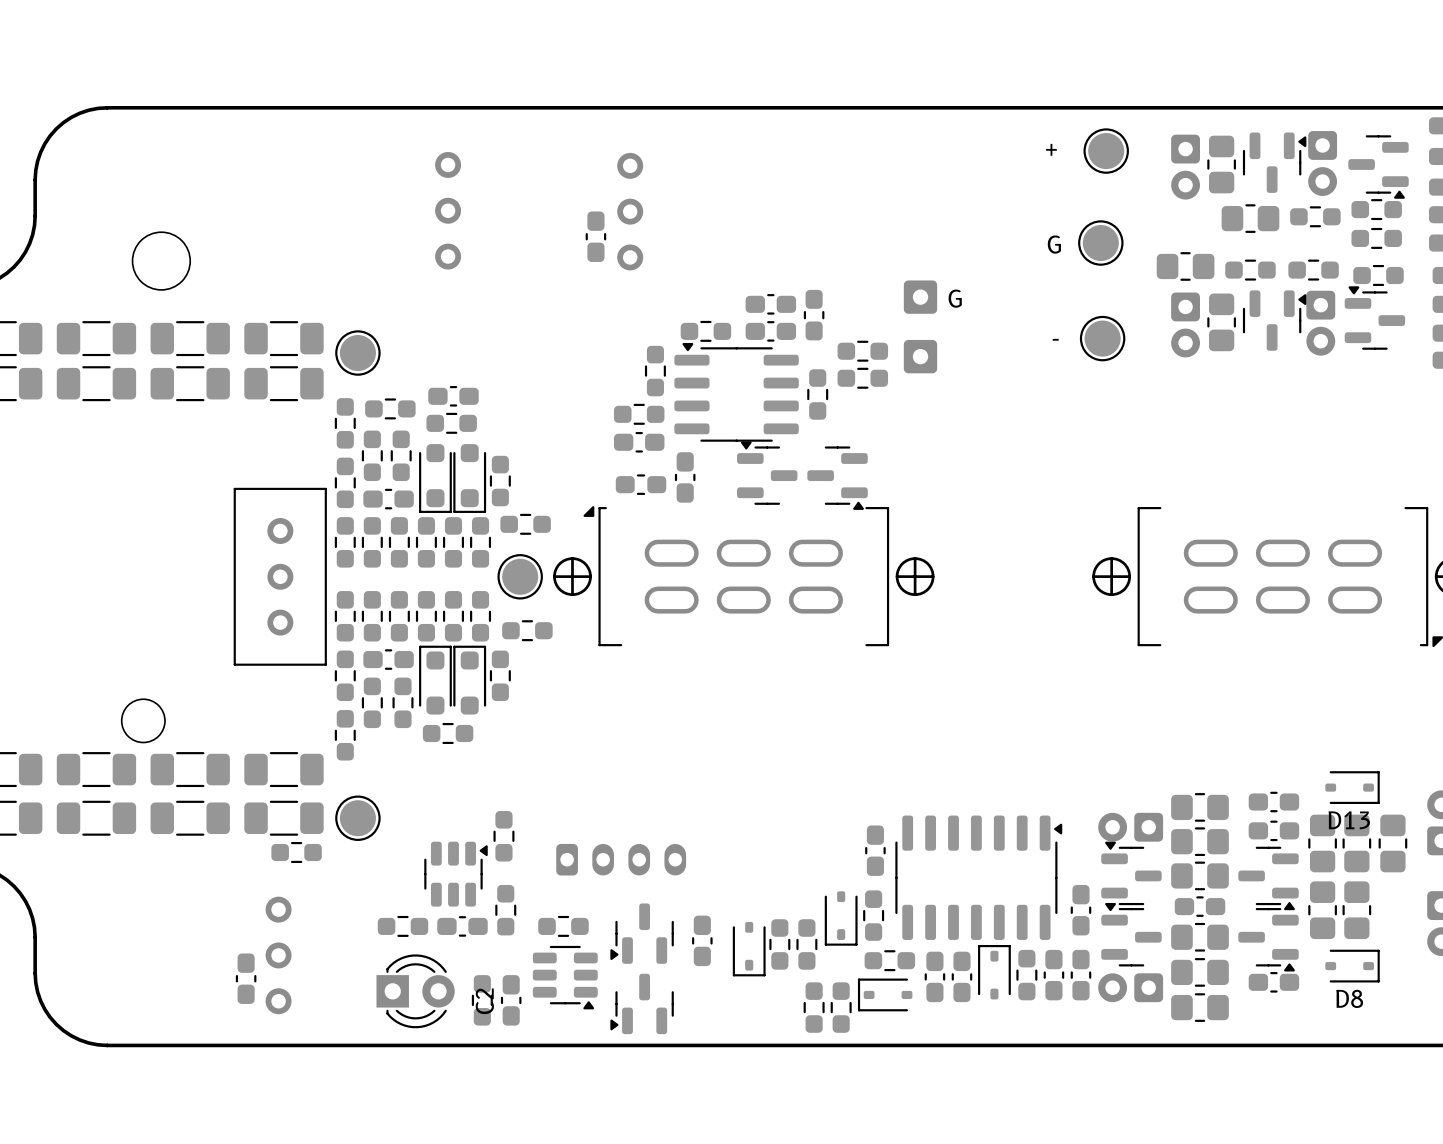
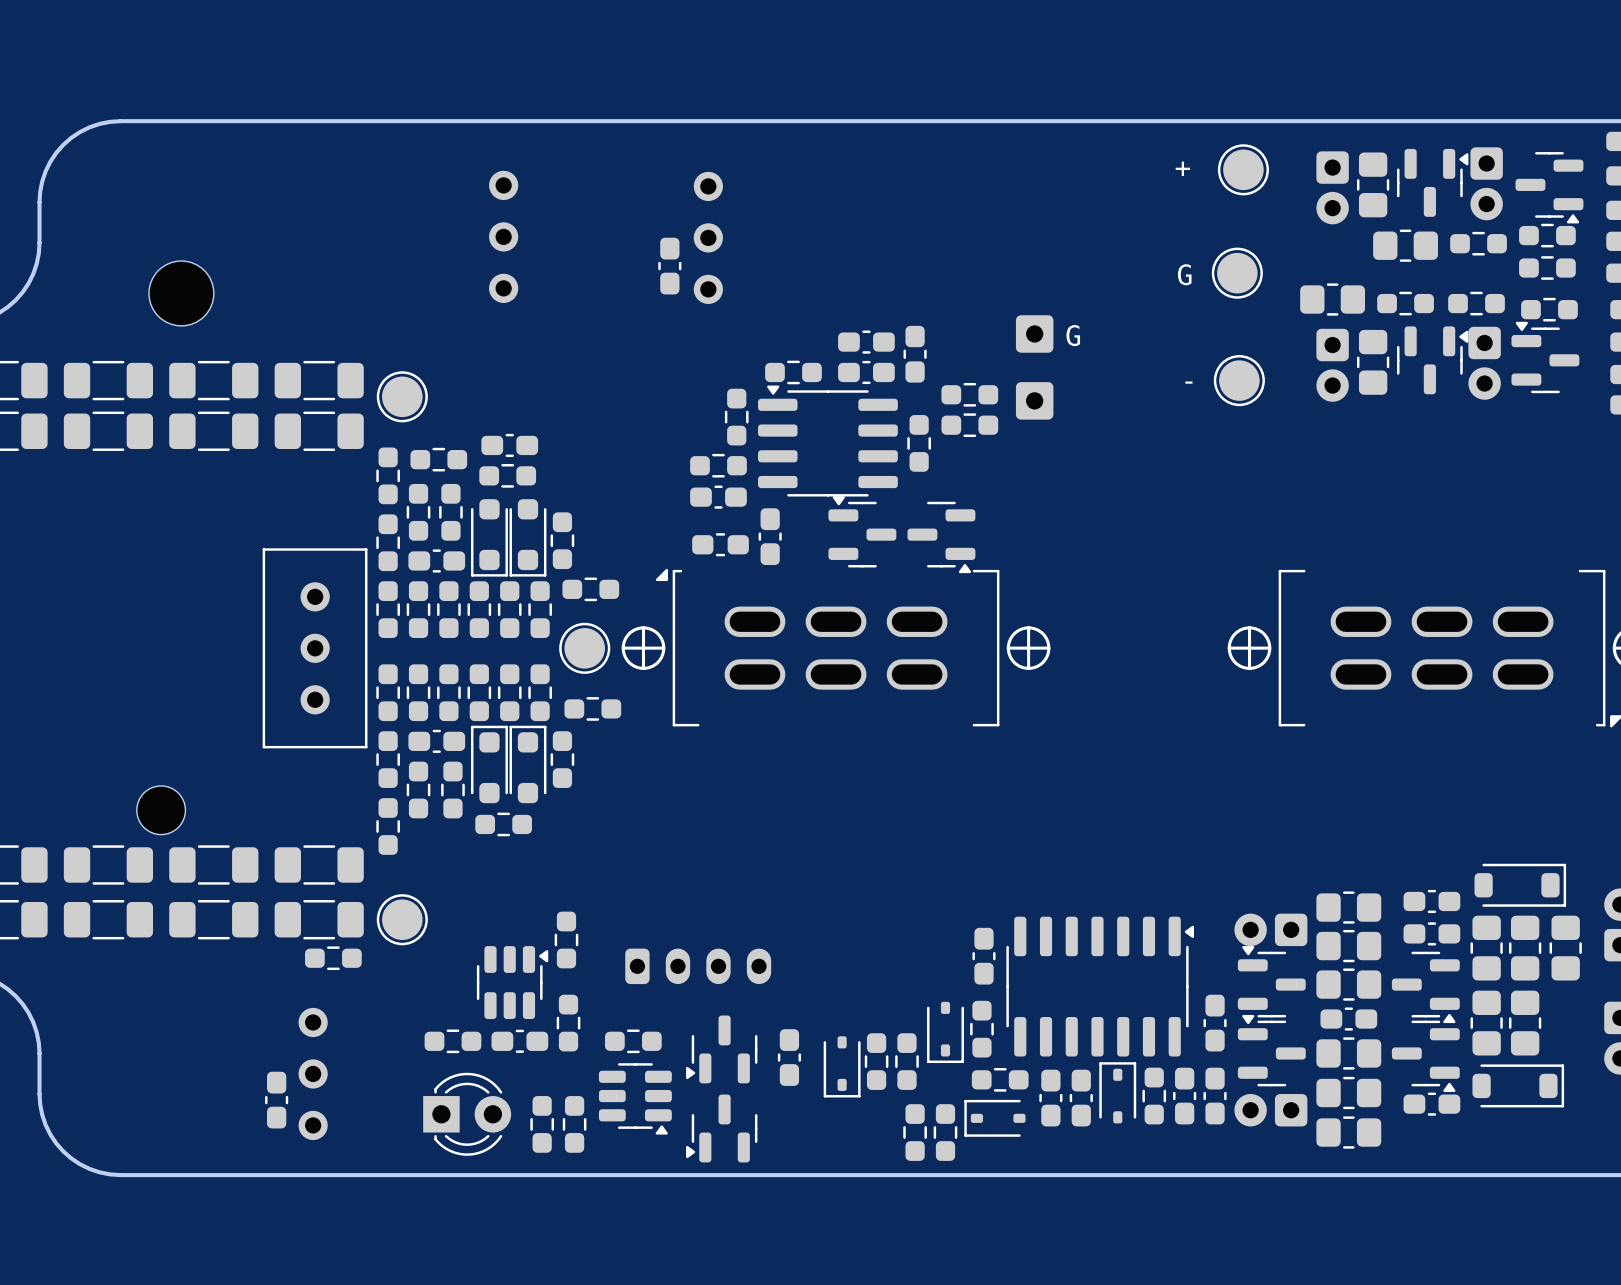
D13: (1352, 787) -> none
part: none -> (1520, 885)
part: none -> (1518, 1085)
D8: (1352, 966) -> none
C2: (511, 1000) -> none
part: none -> (574, 1124)

